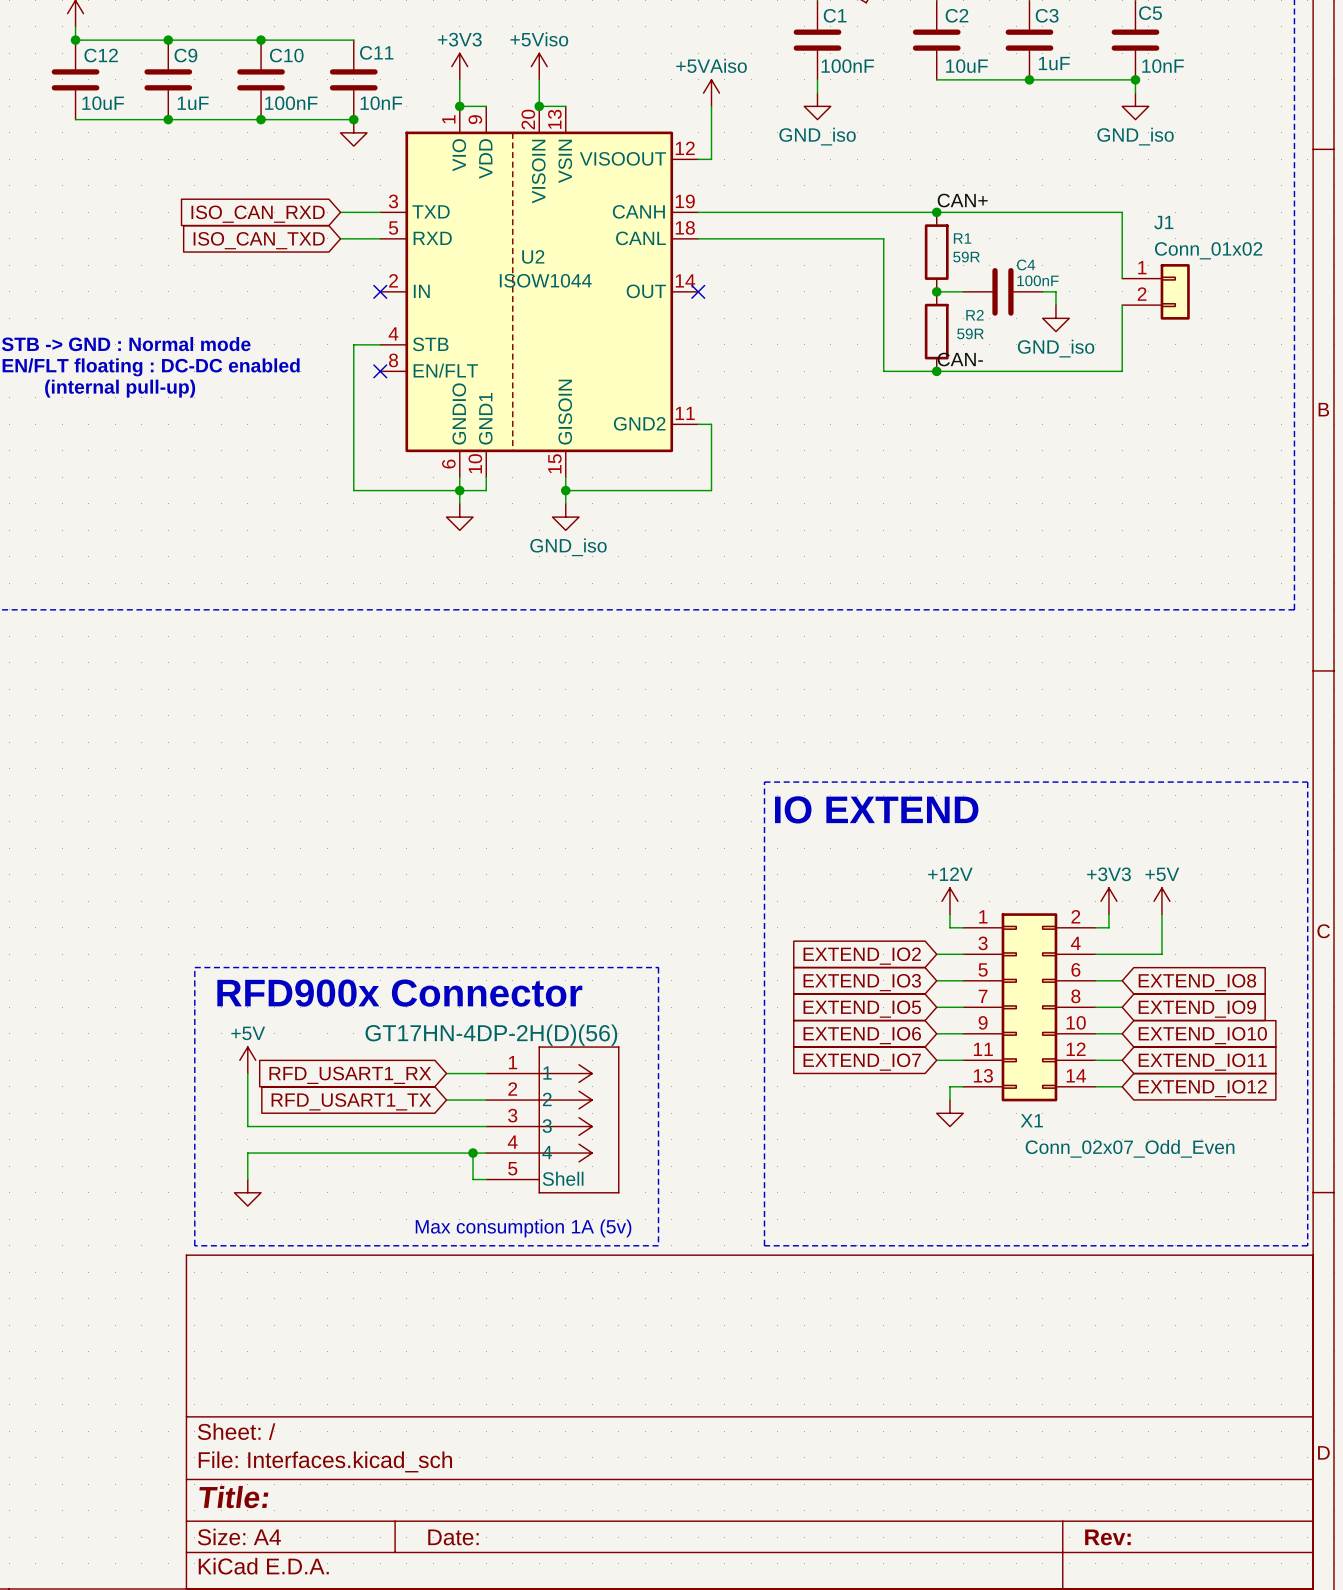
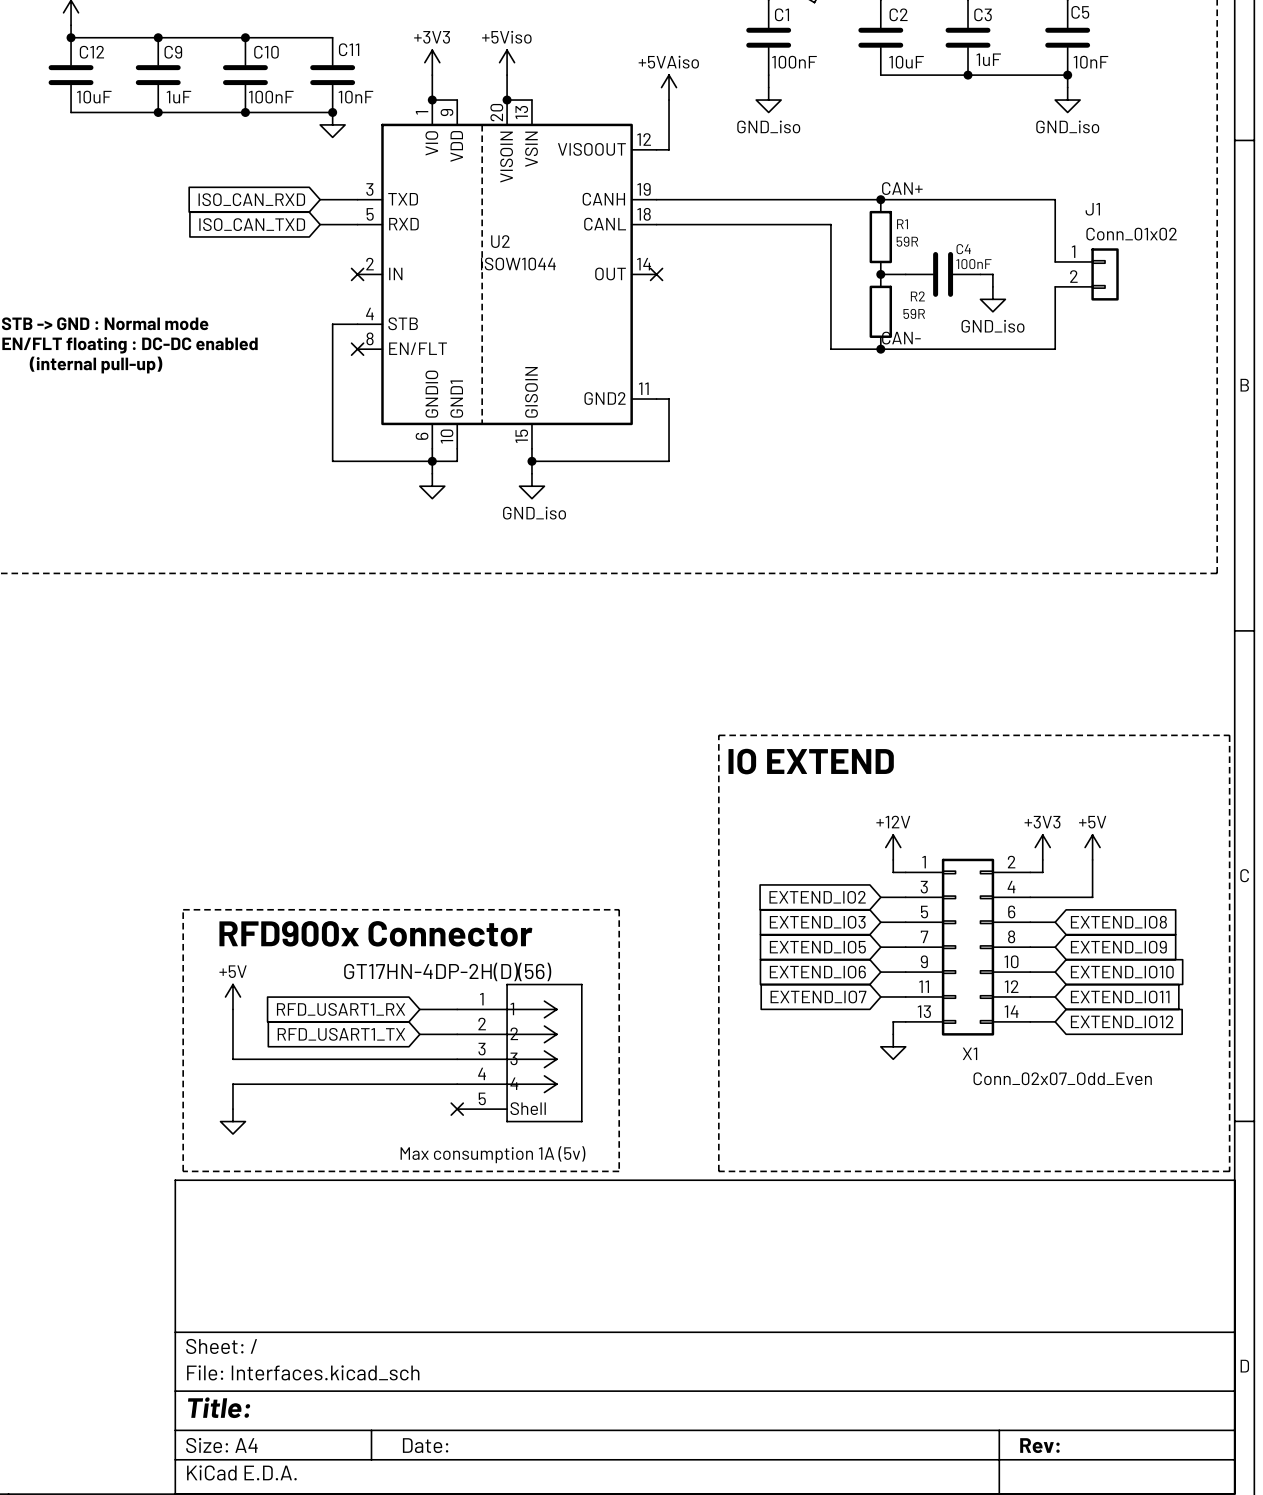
wire: (473, 1153) (473, 1179) (486, 1179) -> none
junction: (473, 1153) -> none
no-connect mark: none -> (457, 1109)

